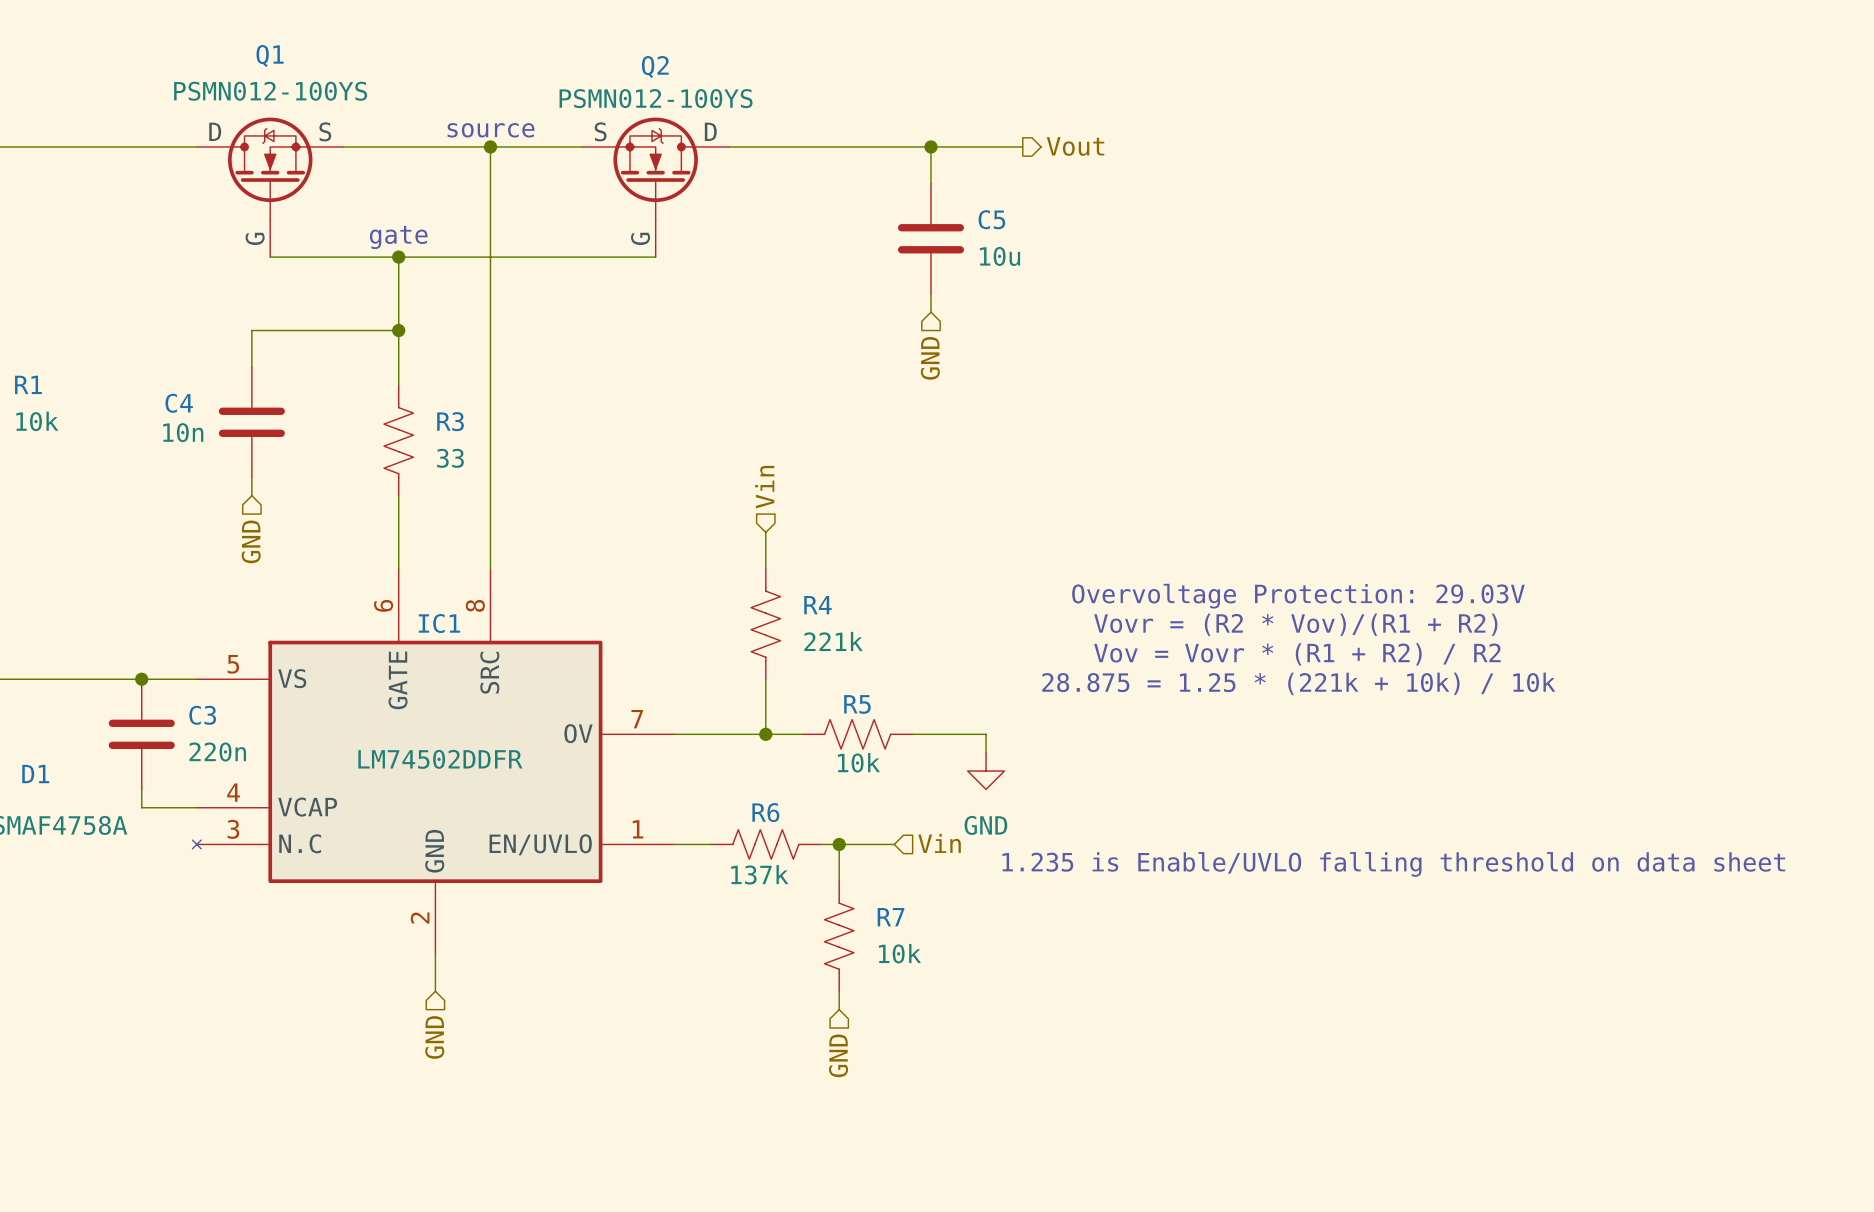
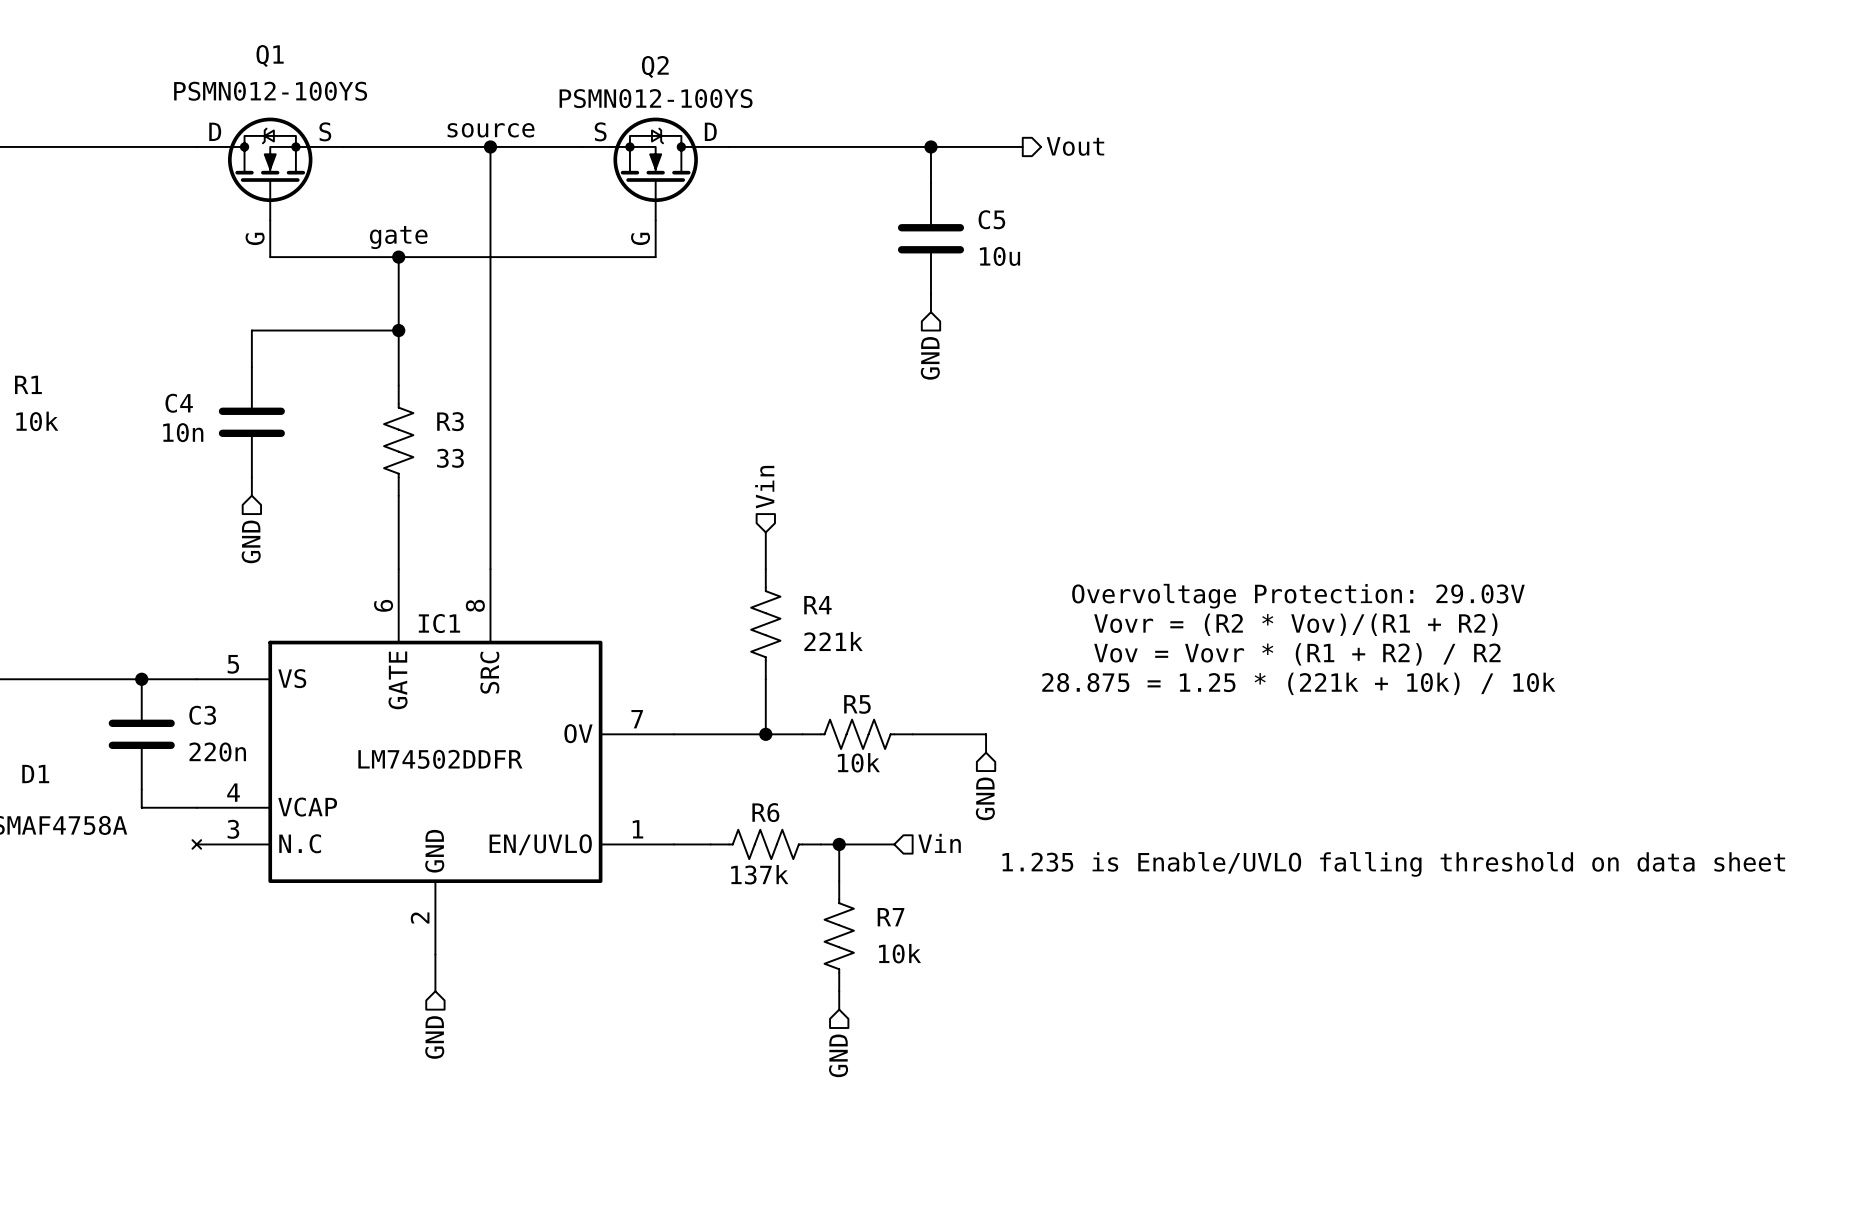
power symbol: GND (986, 771) -> none
hierarchical label: none -> GND (985, 798)

